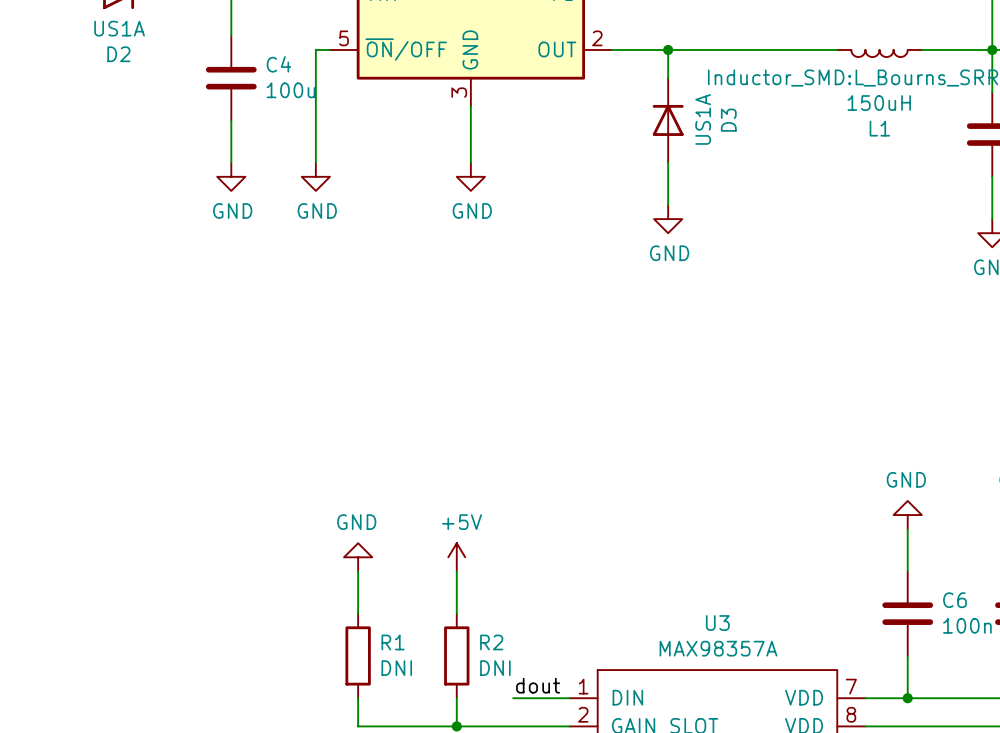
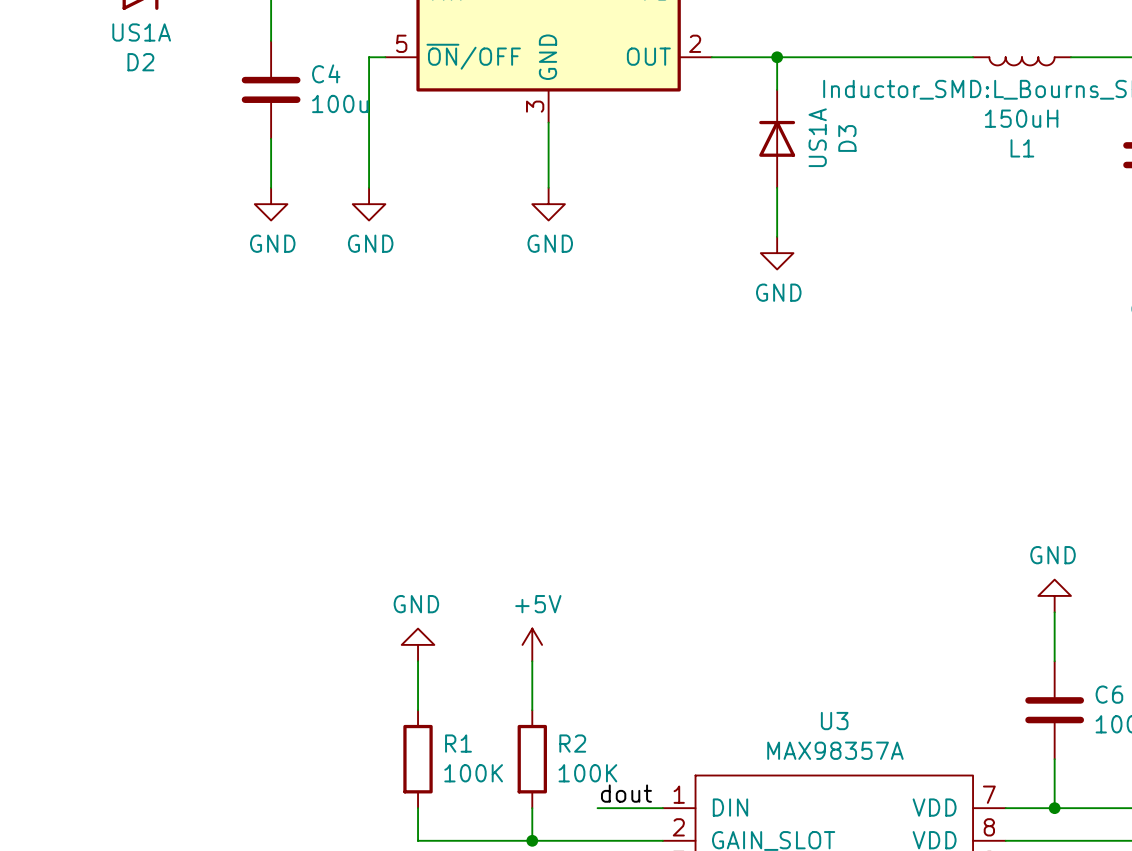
R1 value: DNI (396, 668) -> 100K (473, 773)
R2 value: DNI (495, 668) -> 100K (587, 773)

